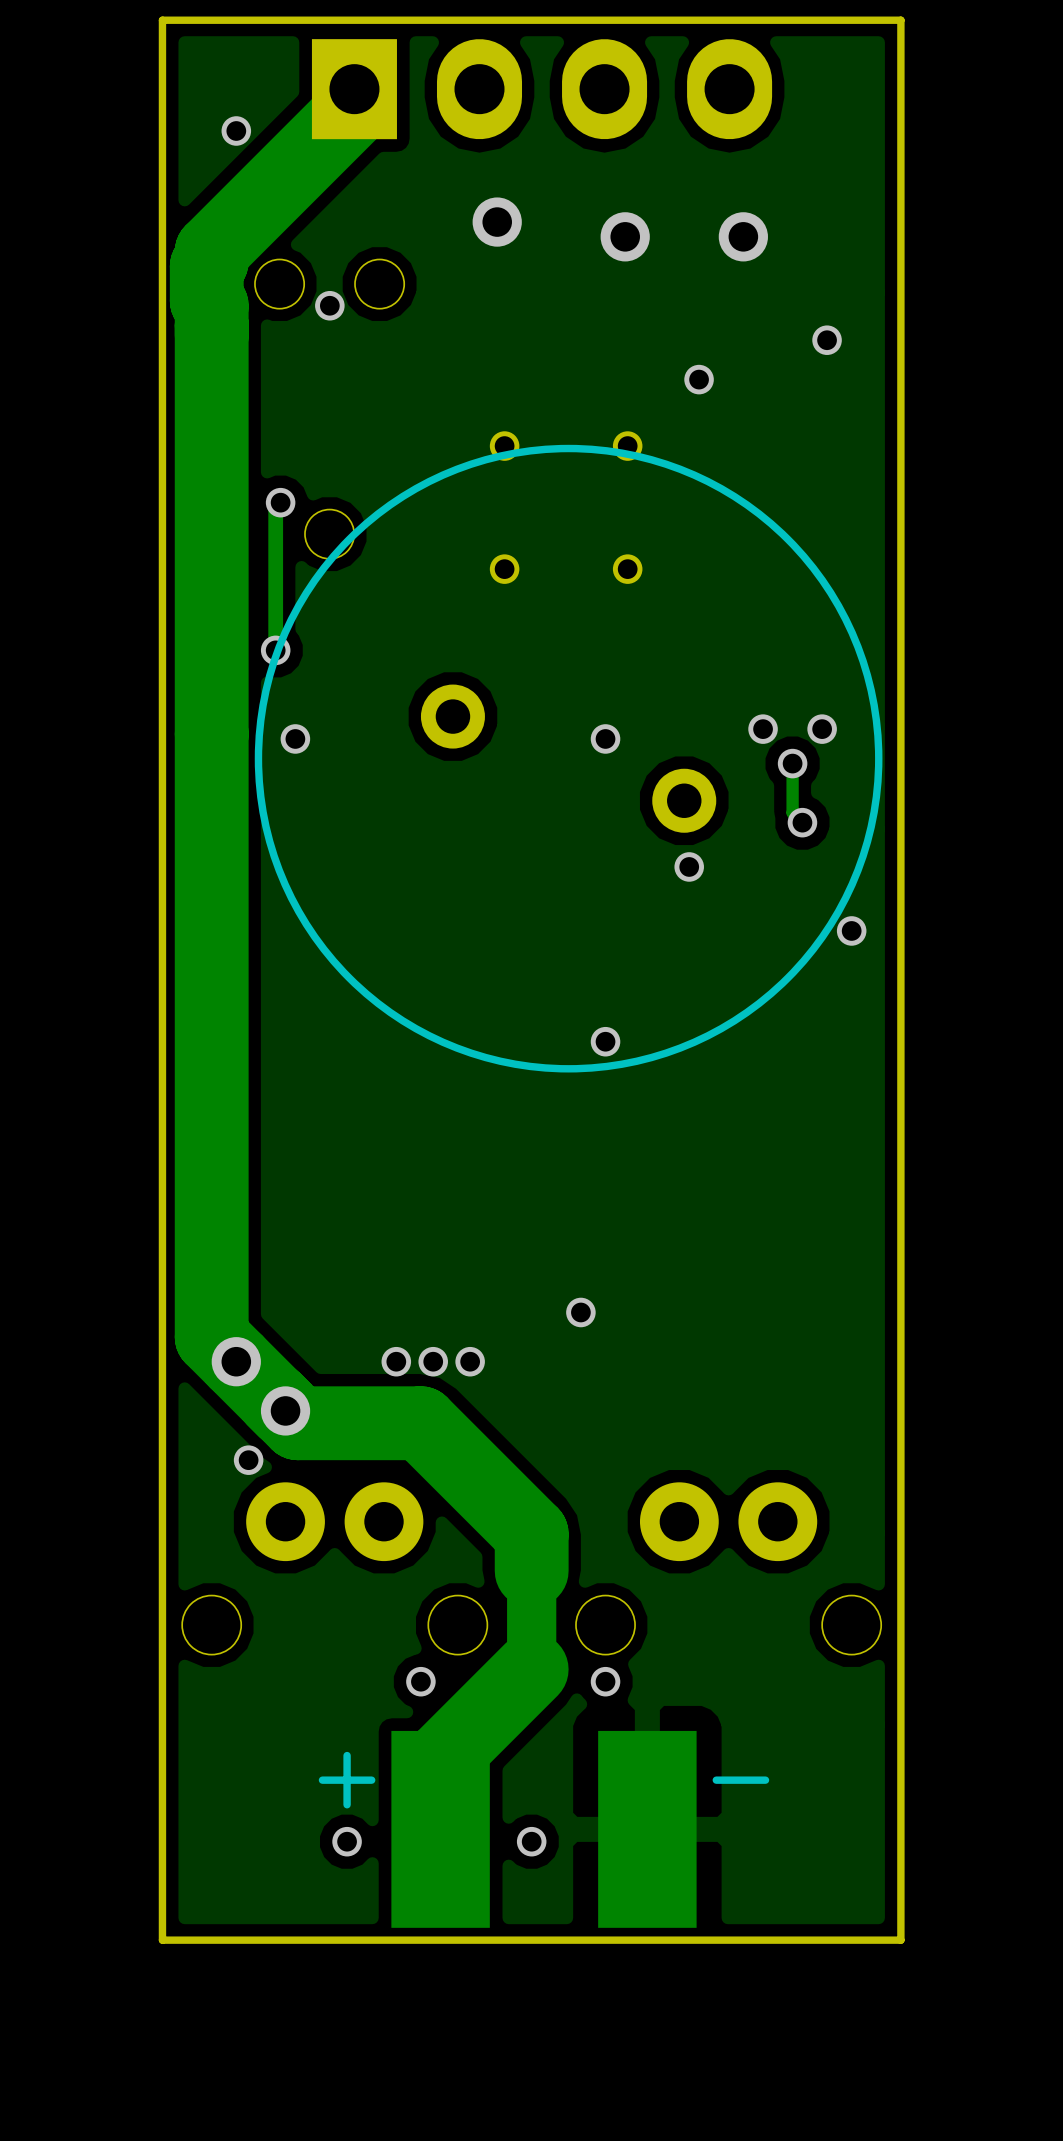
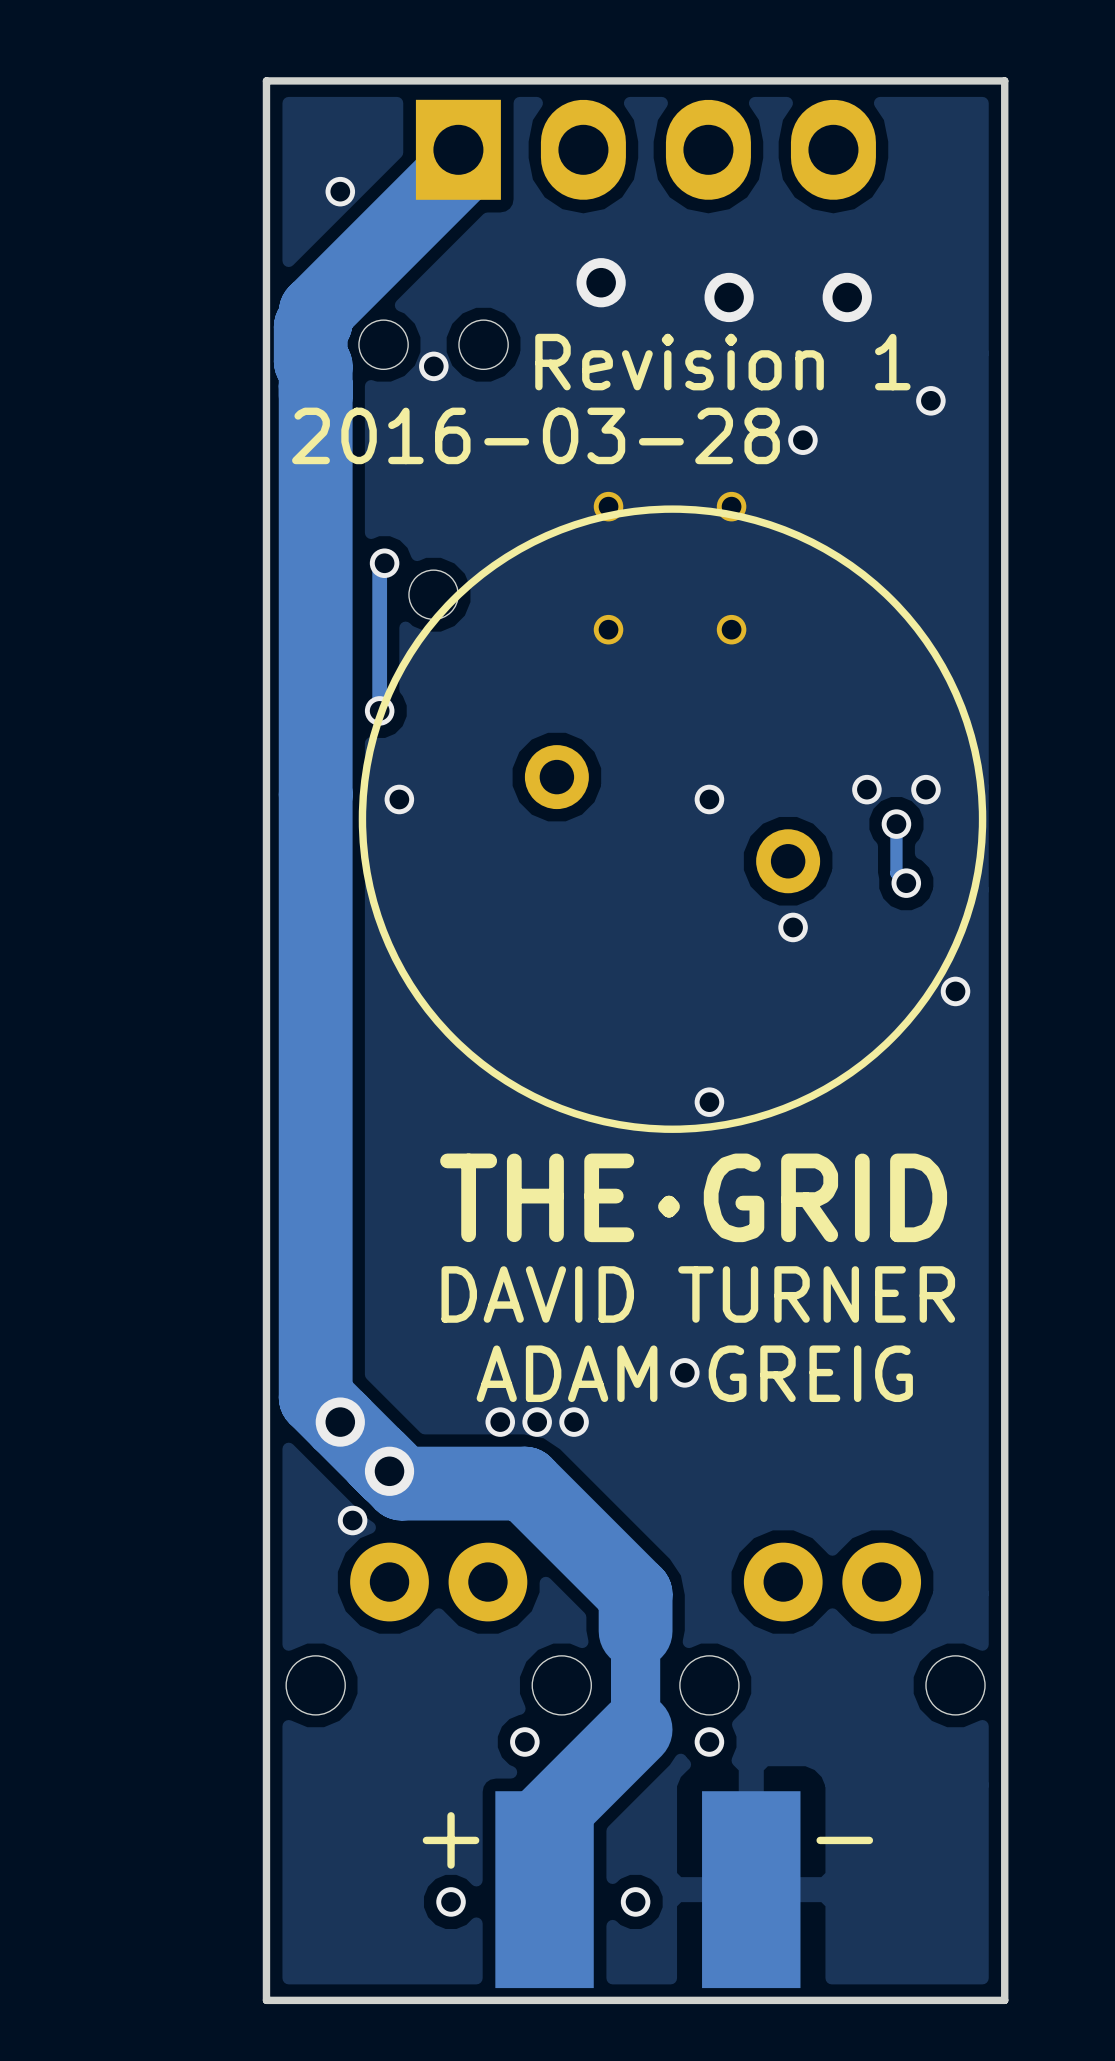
text: none -> Revision 1 (722, 362)
text: none -> 2016-03-28 (535, 435)
text: none -> THE·GRID (693, 1197)
text: none -> DAVID TURNER (698, 1294)
text: none -> ADAM GREIG (694, 1373)

